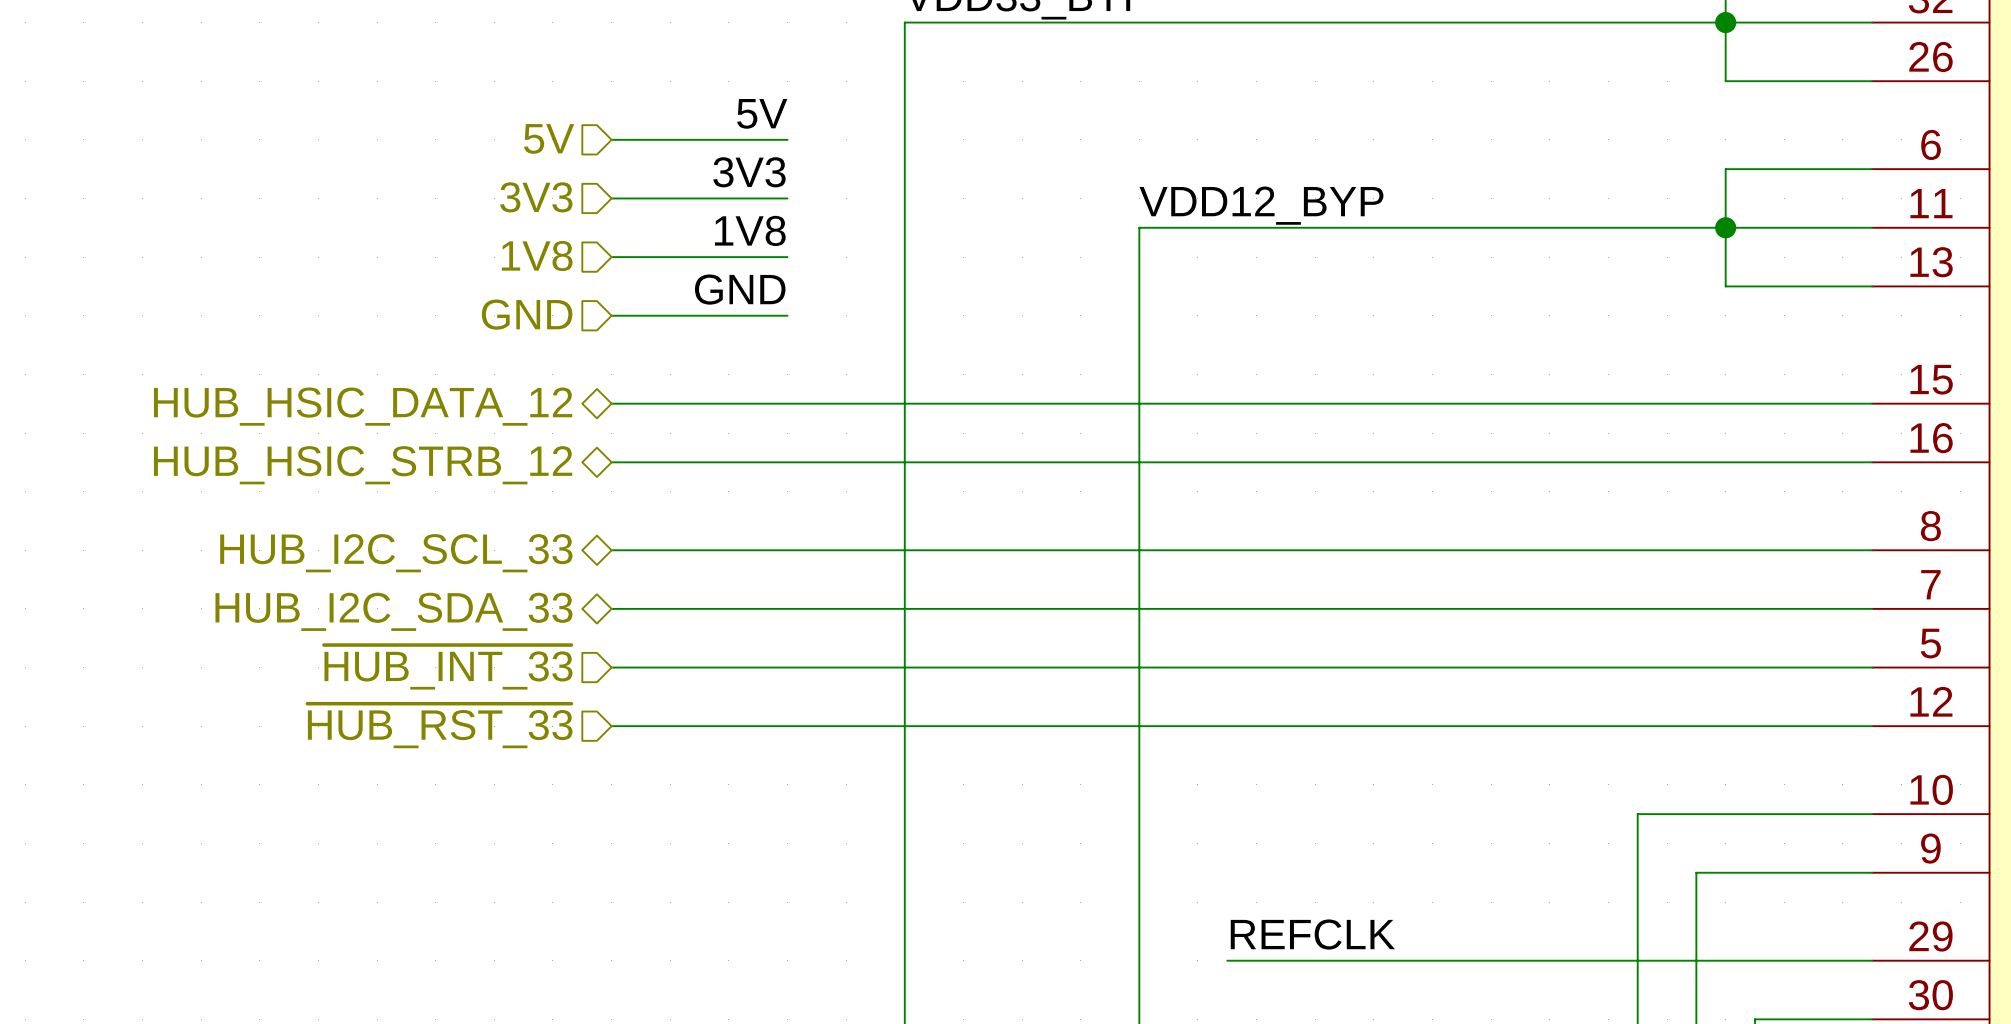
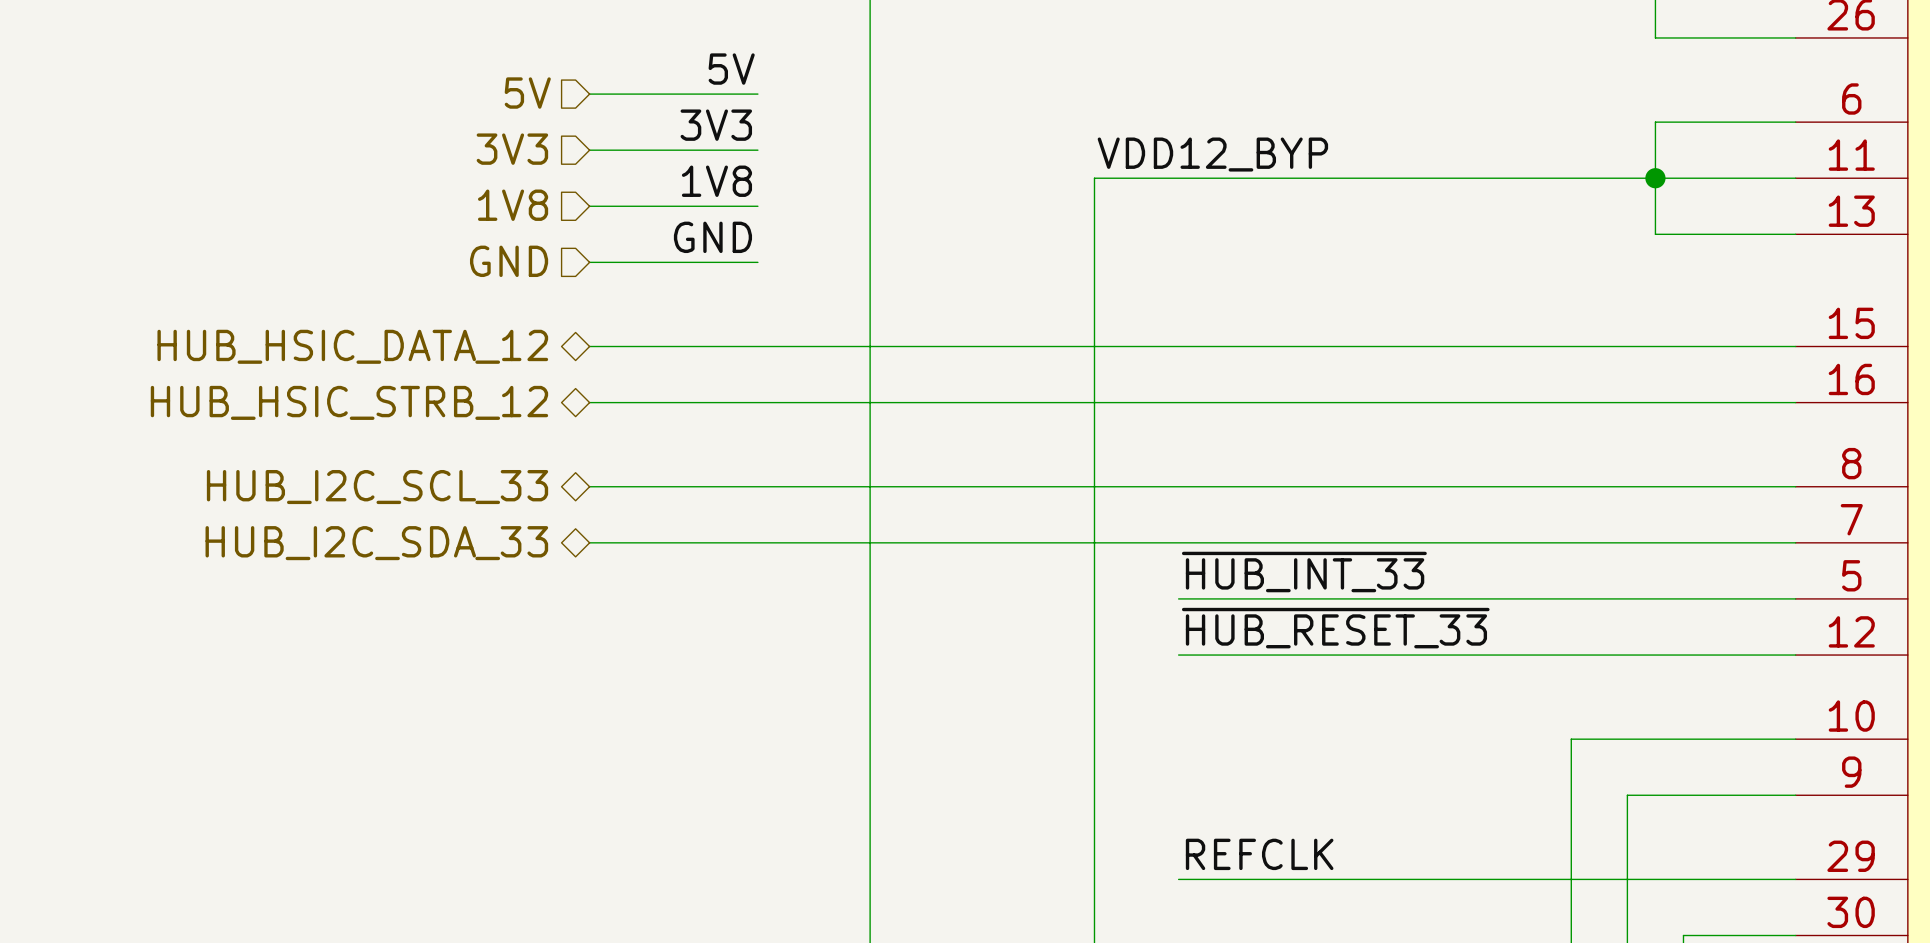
label: none -> ~{HUB_INT_33} (1304, 572)
hierarchical label: ~{HUB_INT_33} (448, 667) -> none
wire: (611, 667) (1227, 667) -> none
label: none -> ~{HUB_RESET_33} (1335, 628)
hierarchical label: ~{HUB_RST_33} (439, 725) -> none
wire: (611, 726) (1227, 726) -> none

